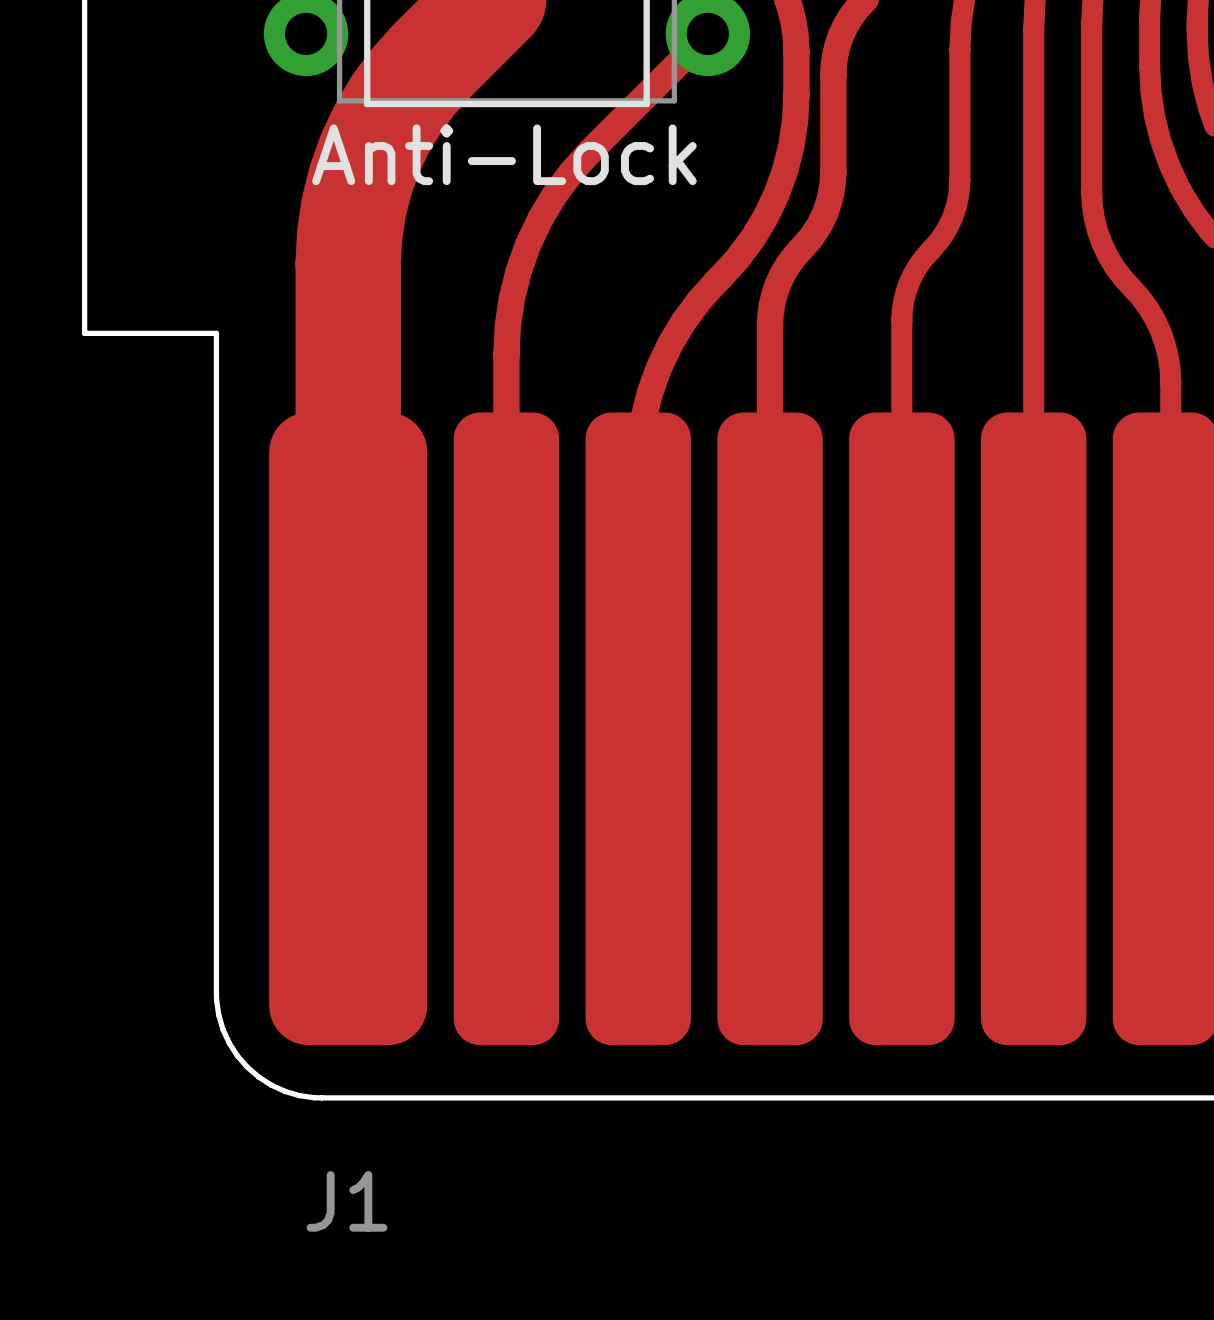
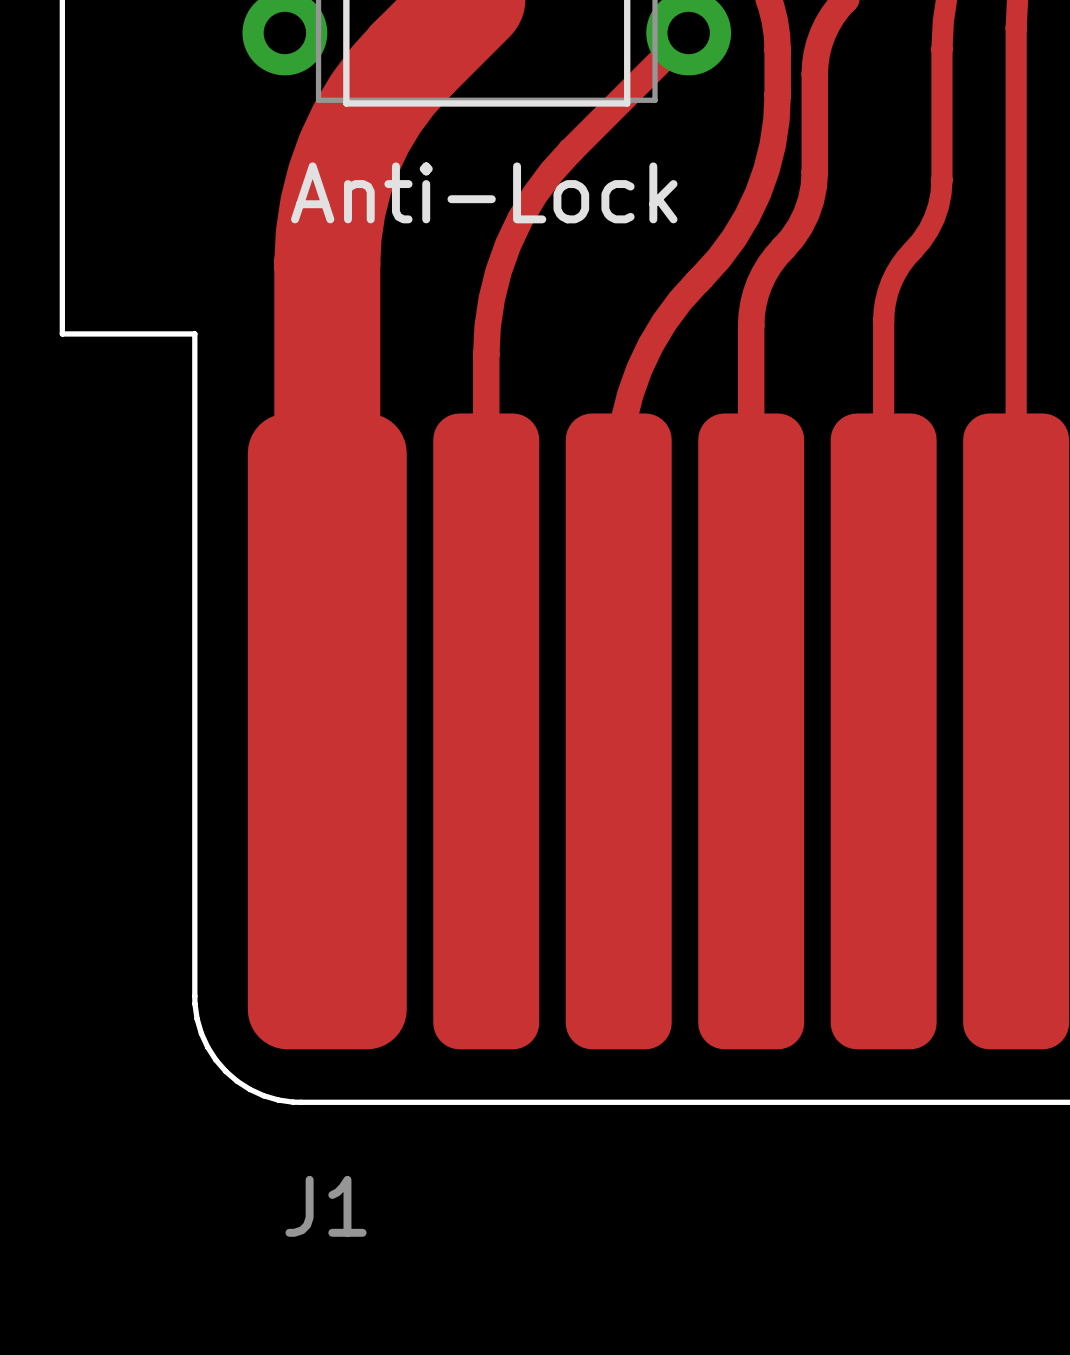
part value position: Anti-Lock (504, 154) -> Anti-Lock (484, 192)

